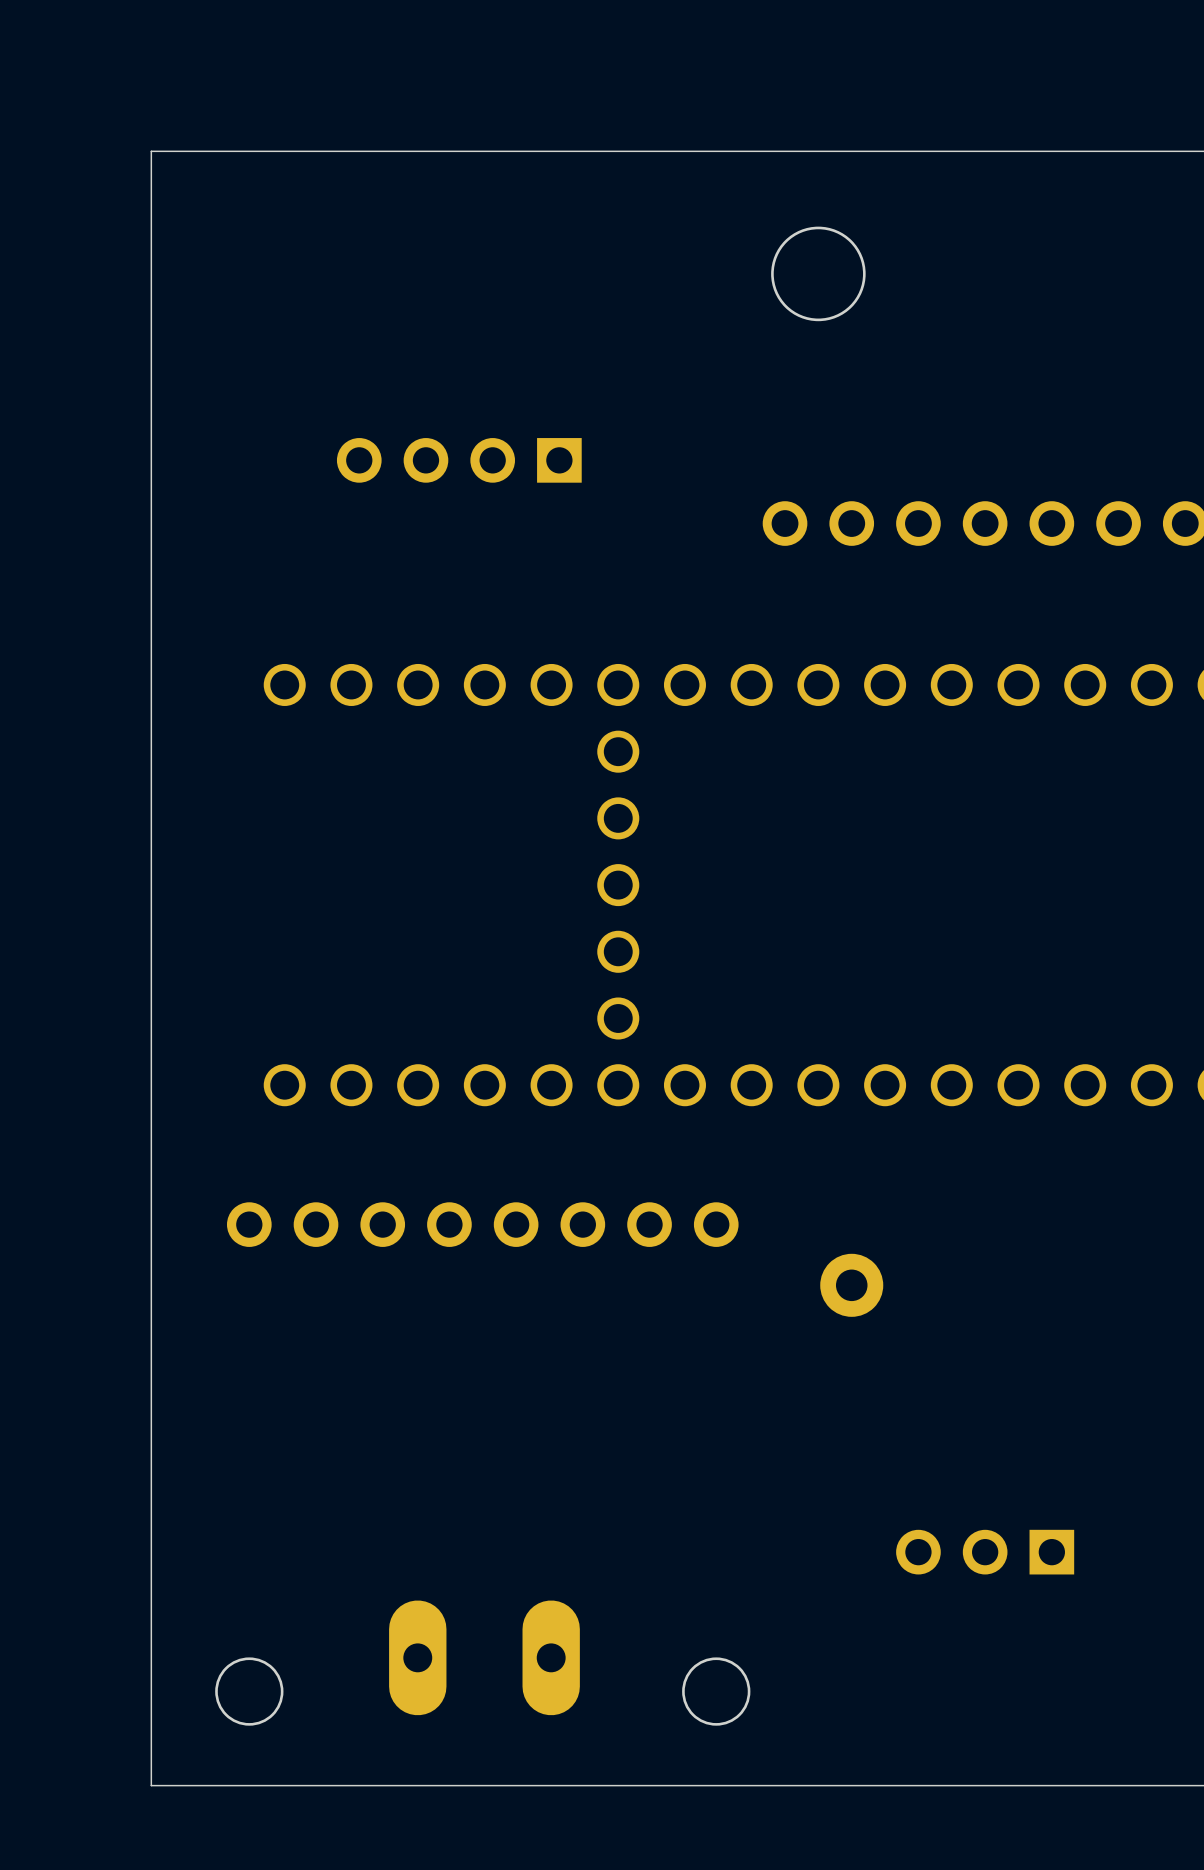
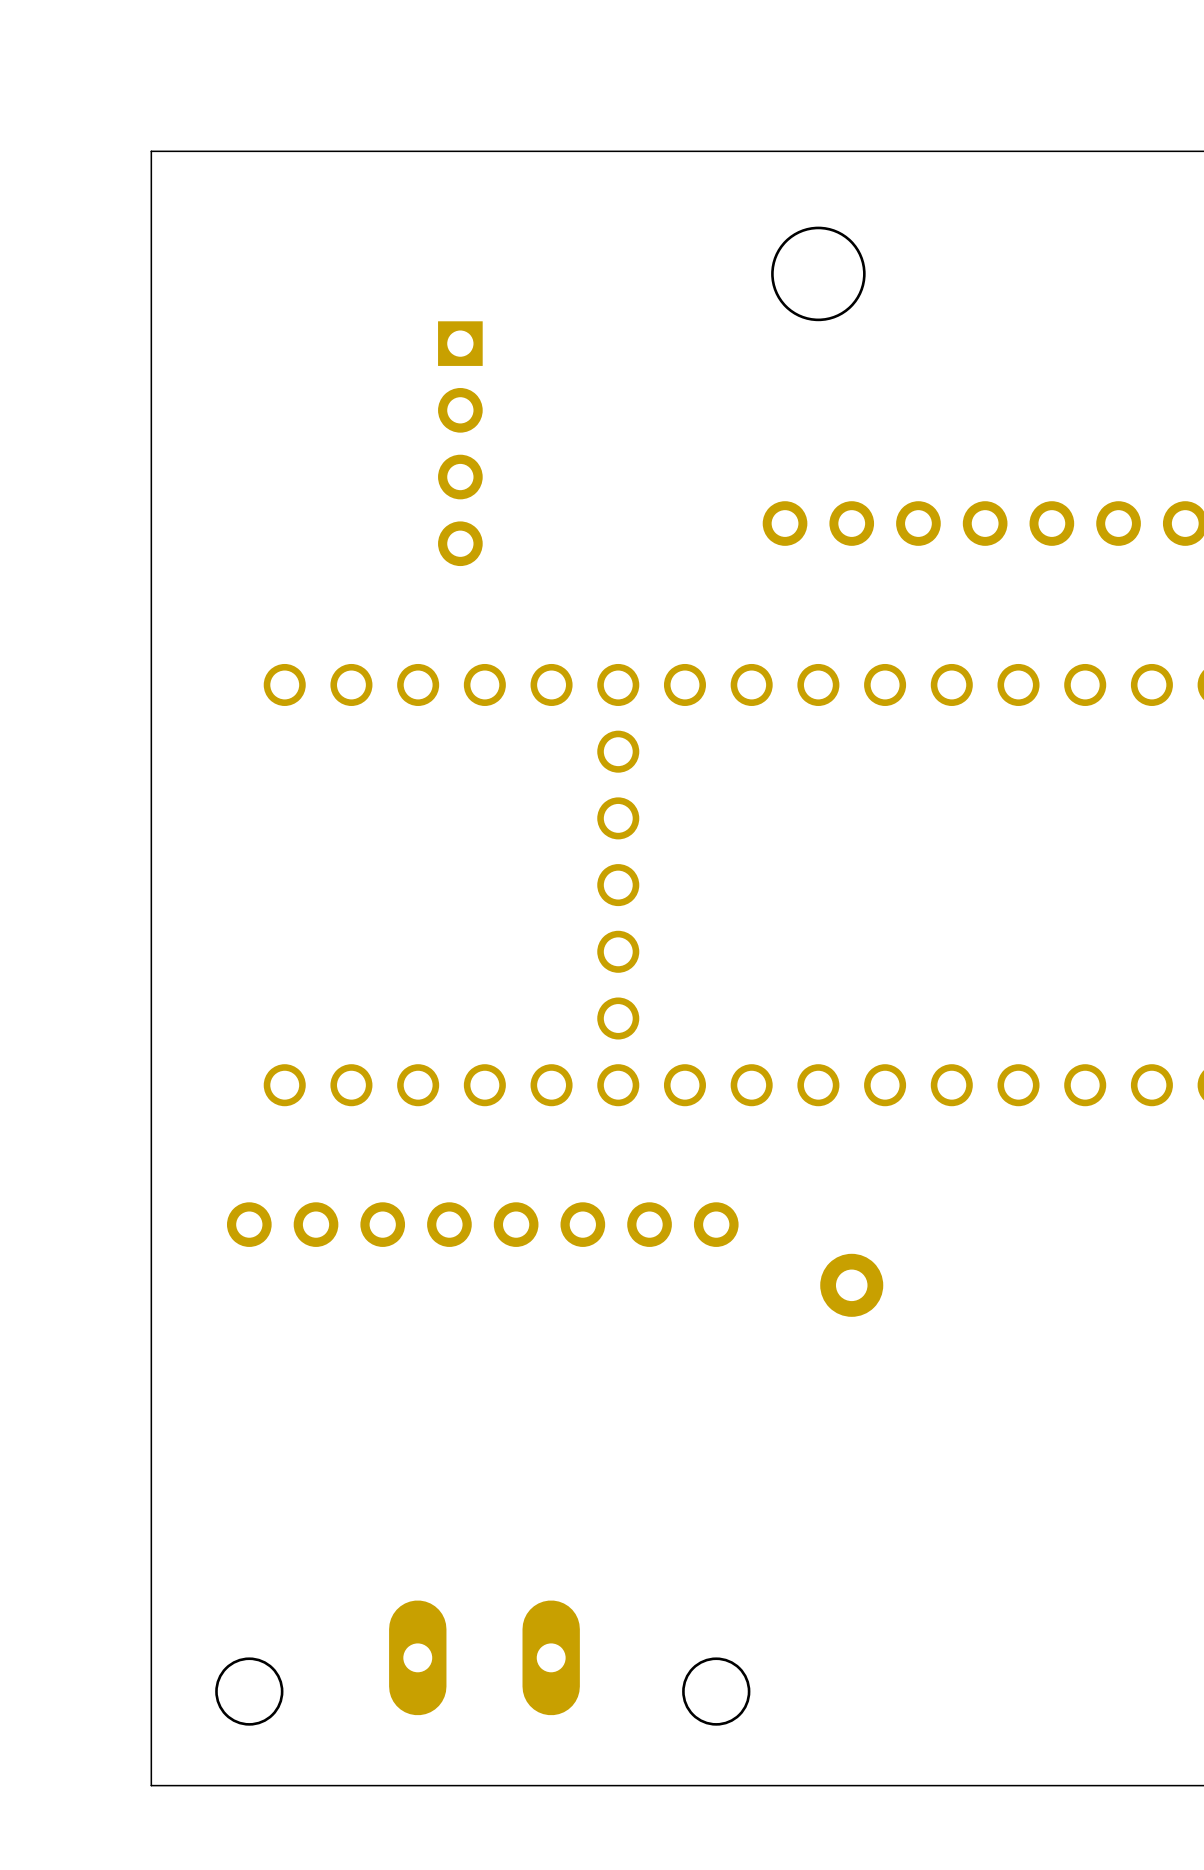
part rotation: 0° (459, 460) -> 90° counterclockwise (460, 443)
part: (985, 1552) -> none

